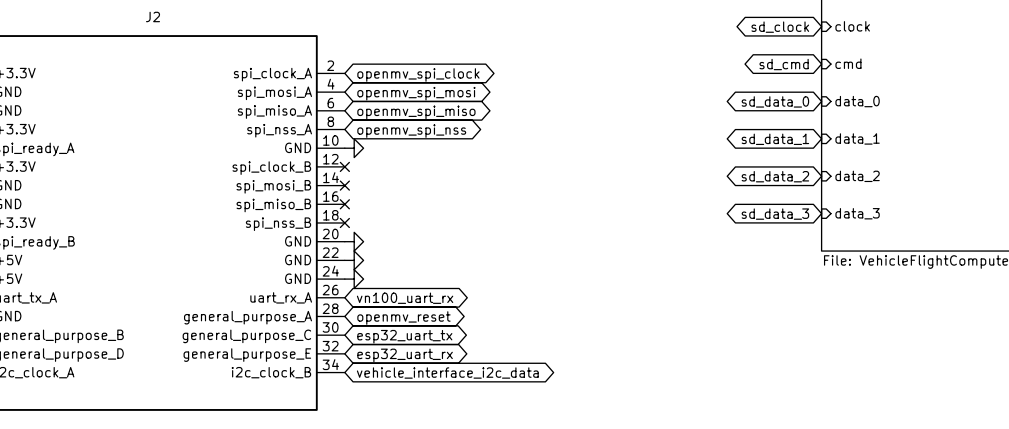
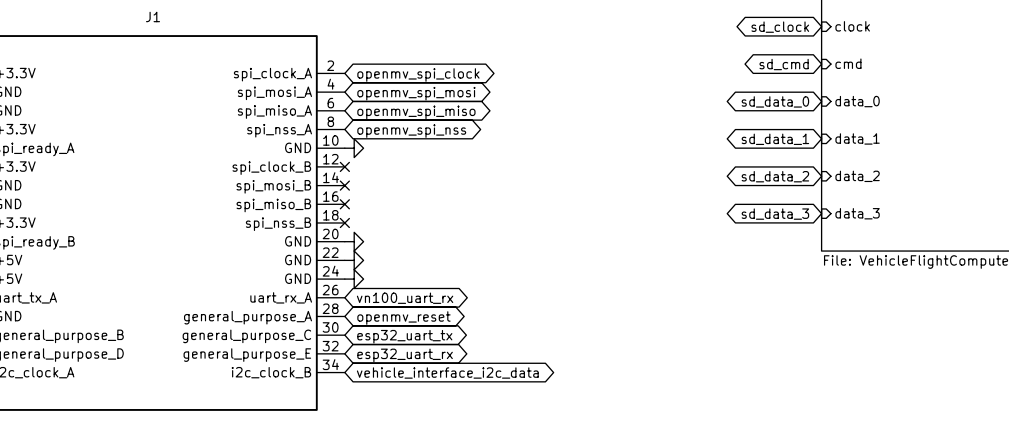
J2 name: J2 (152, 16) -> J1 (152, 16)

